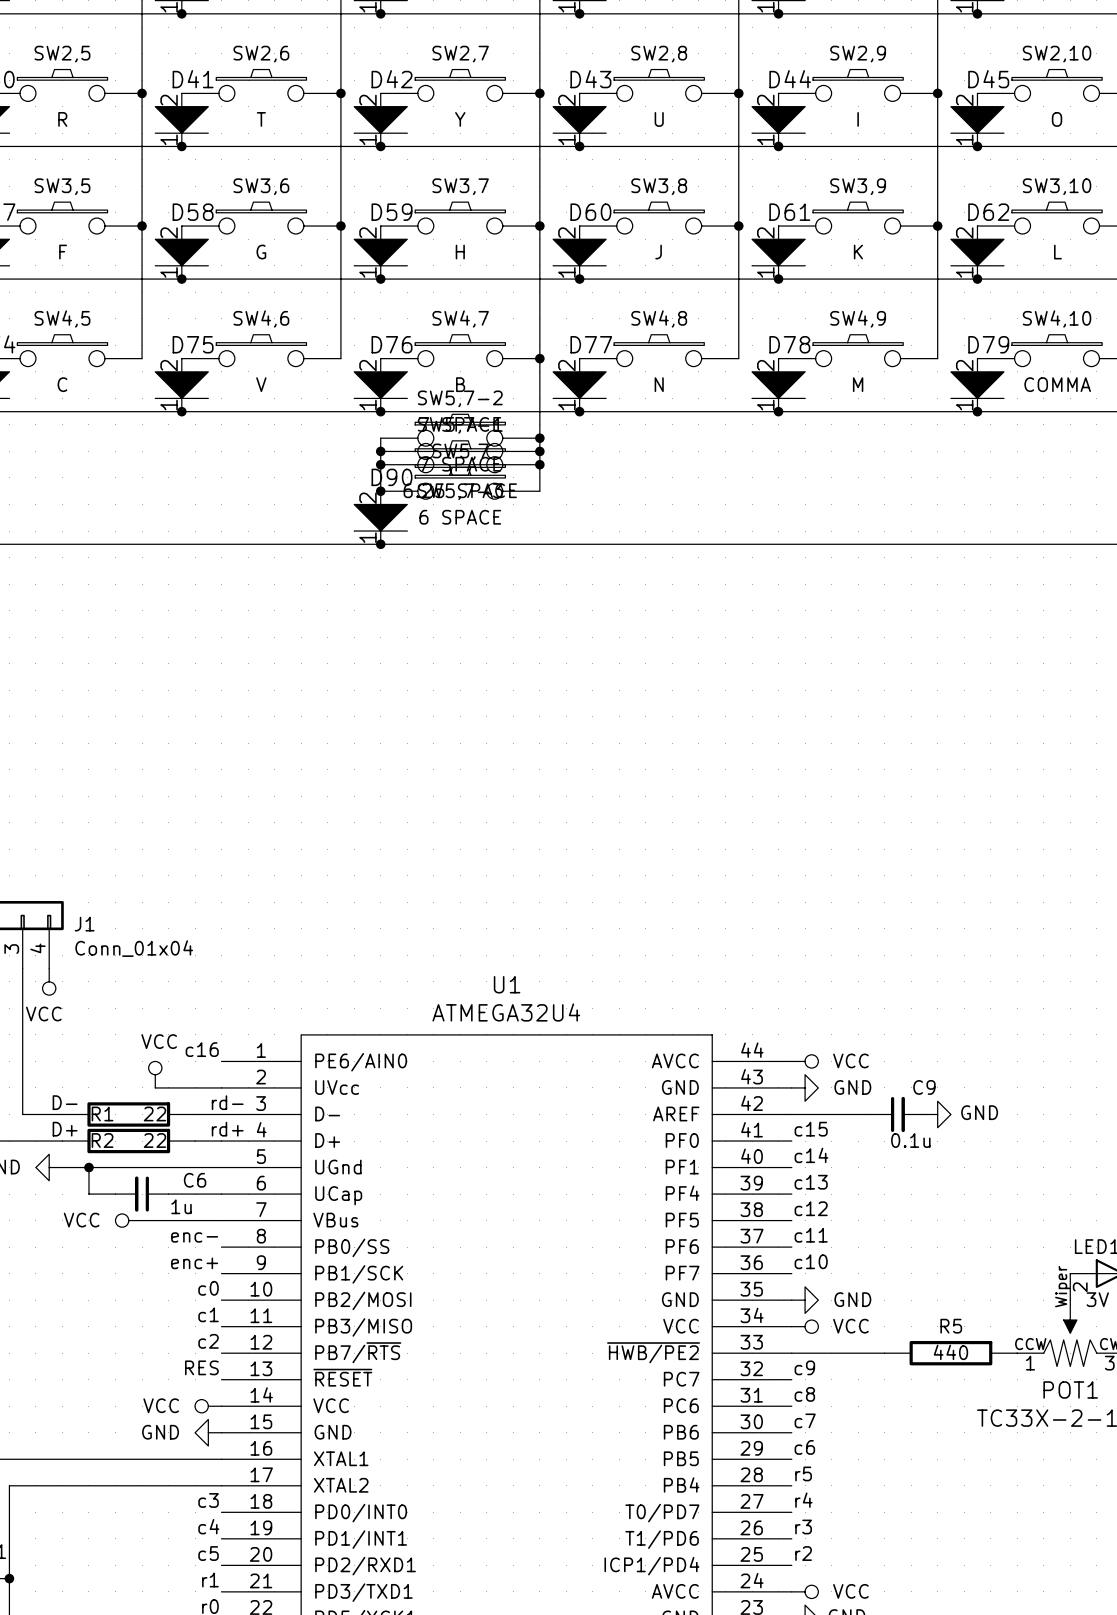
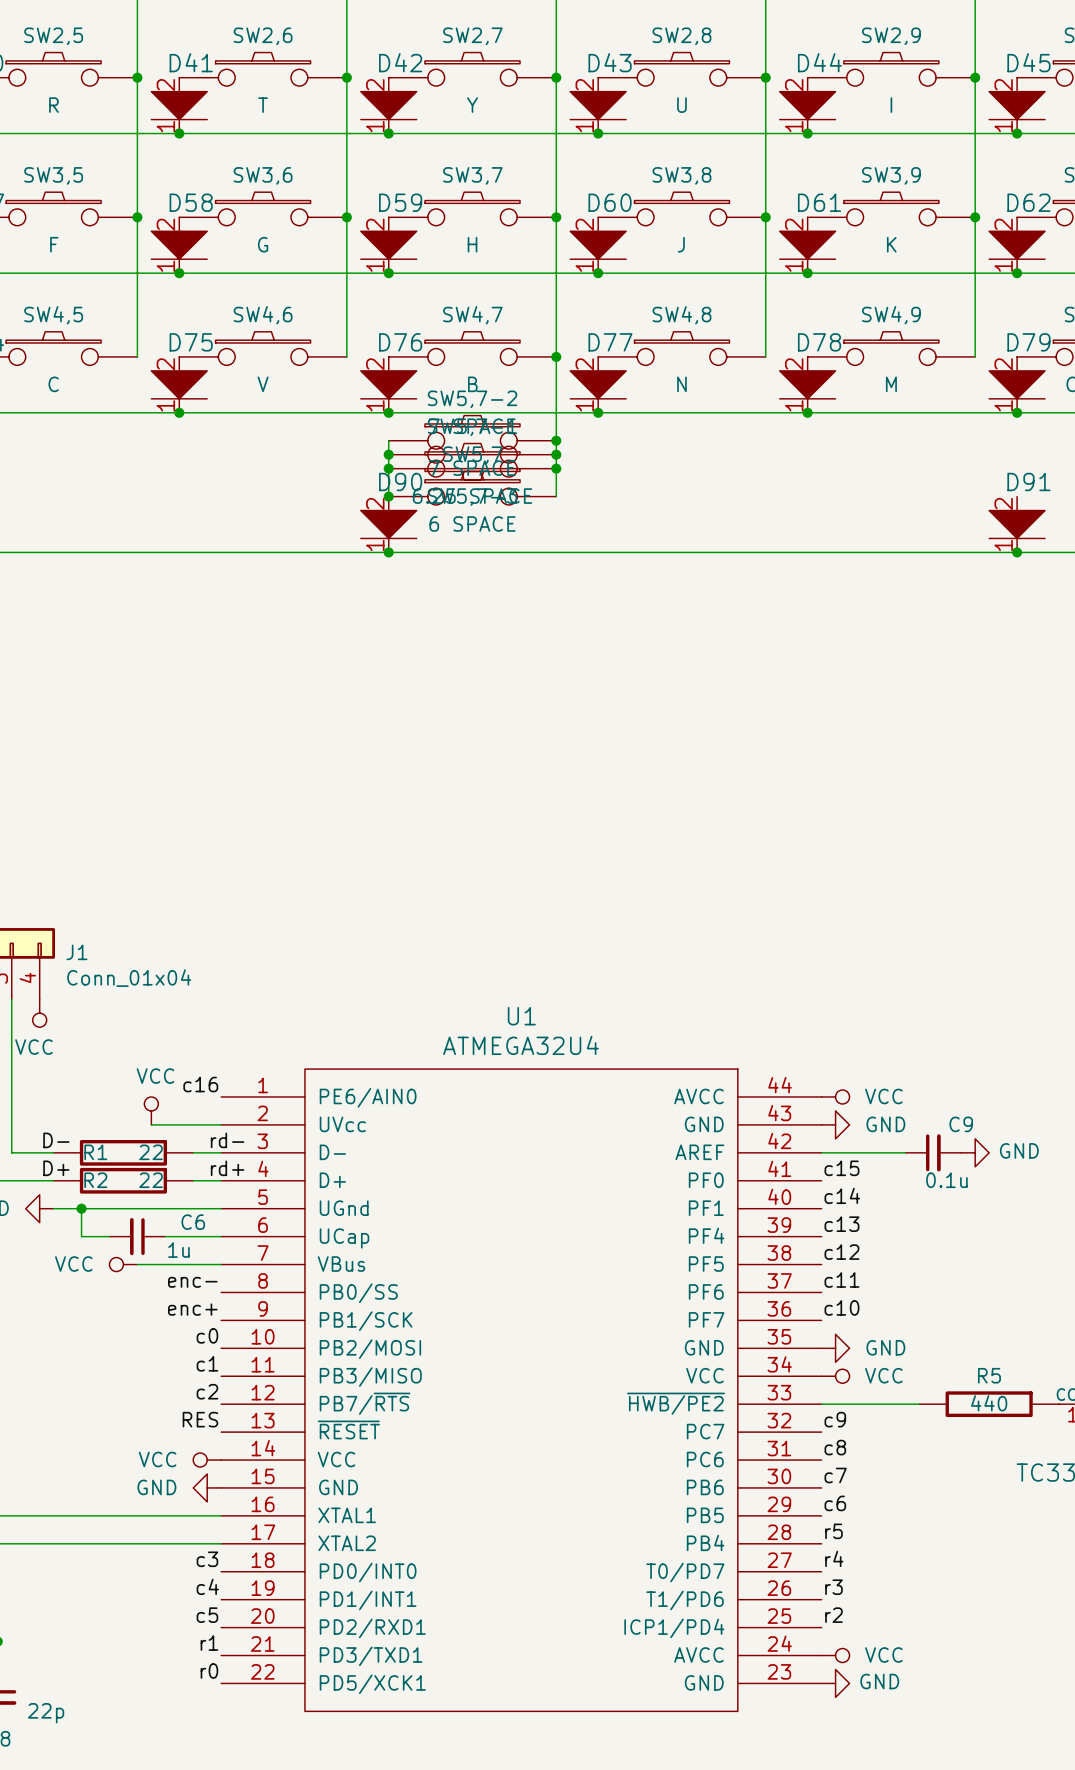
D91: none -> (1017, 524)
junction: none -> (1017, 552)

